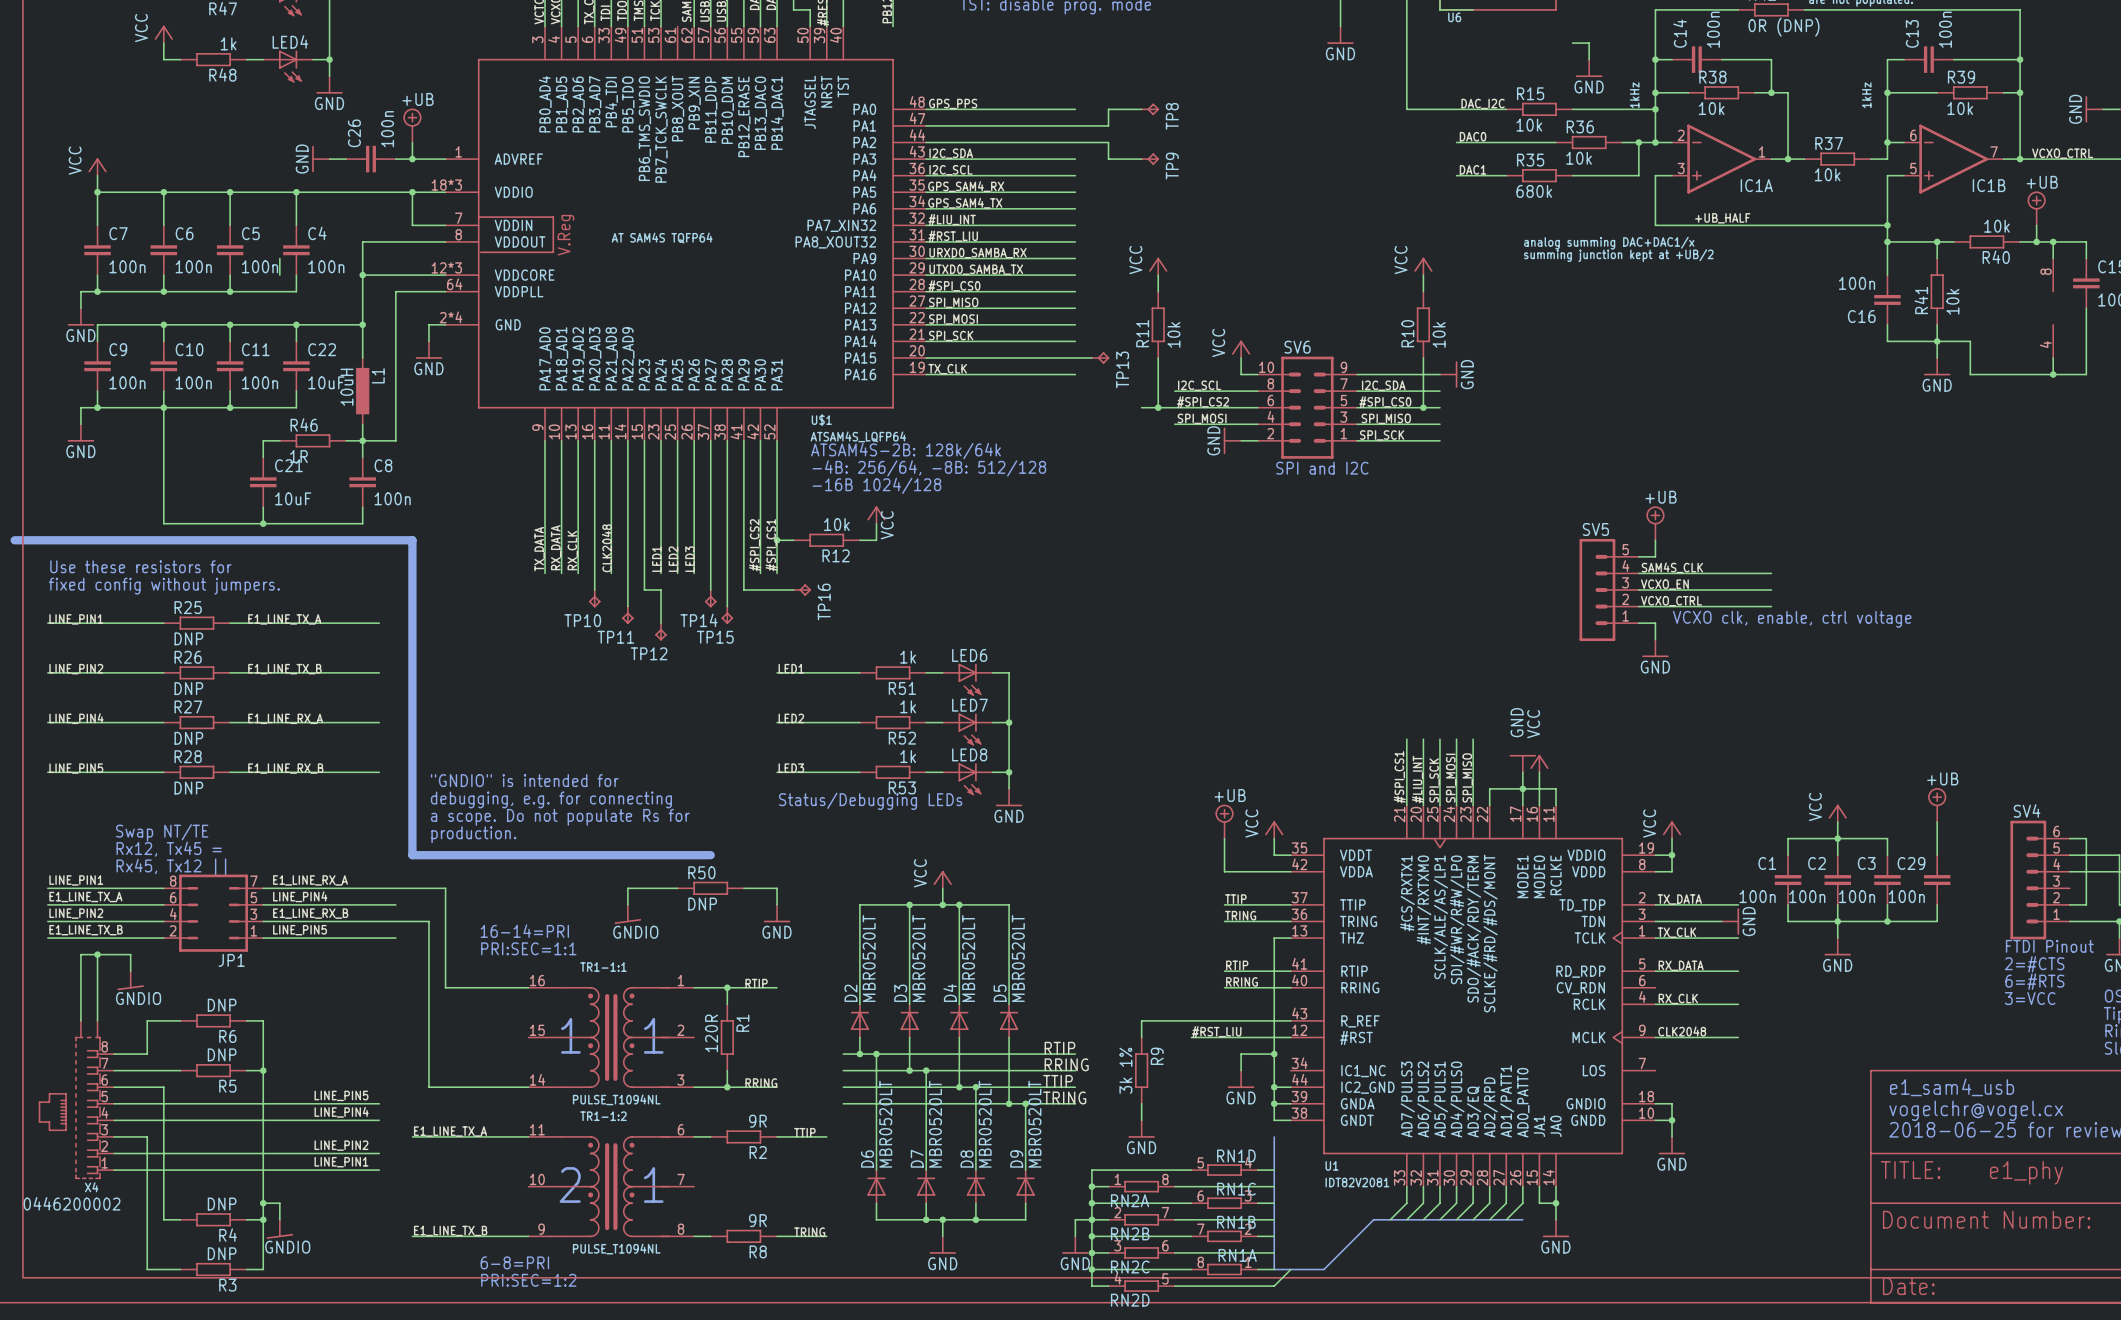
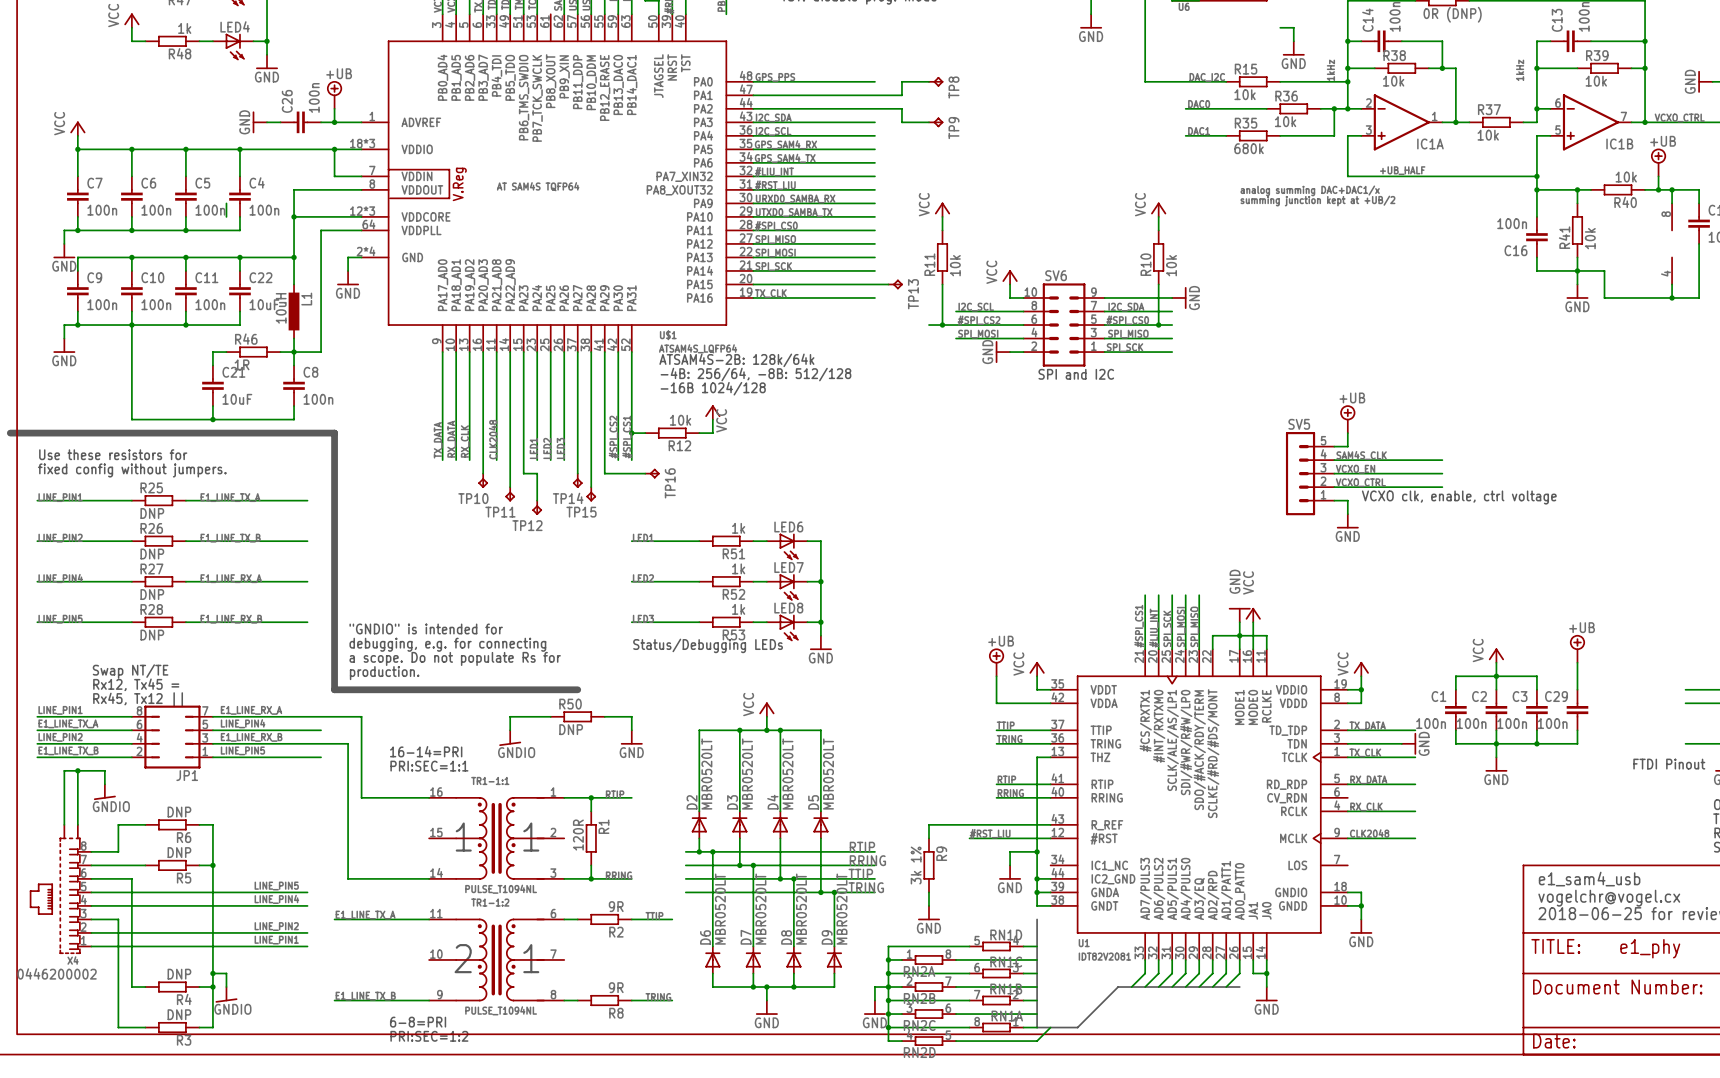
wire: (2069, 838) (2086, 838) (2086, 904) (2069, 904) -> none
SV4: (2040, 880) -> none
text: 2=#CTS (2034, 964) -> none
text: 6=#RTS (2034, 981) -> none
text: 3=VCC (2030, 998) -> none

